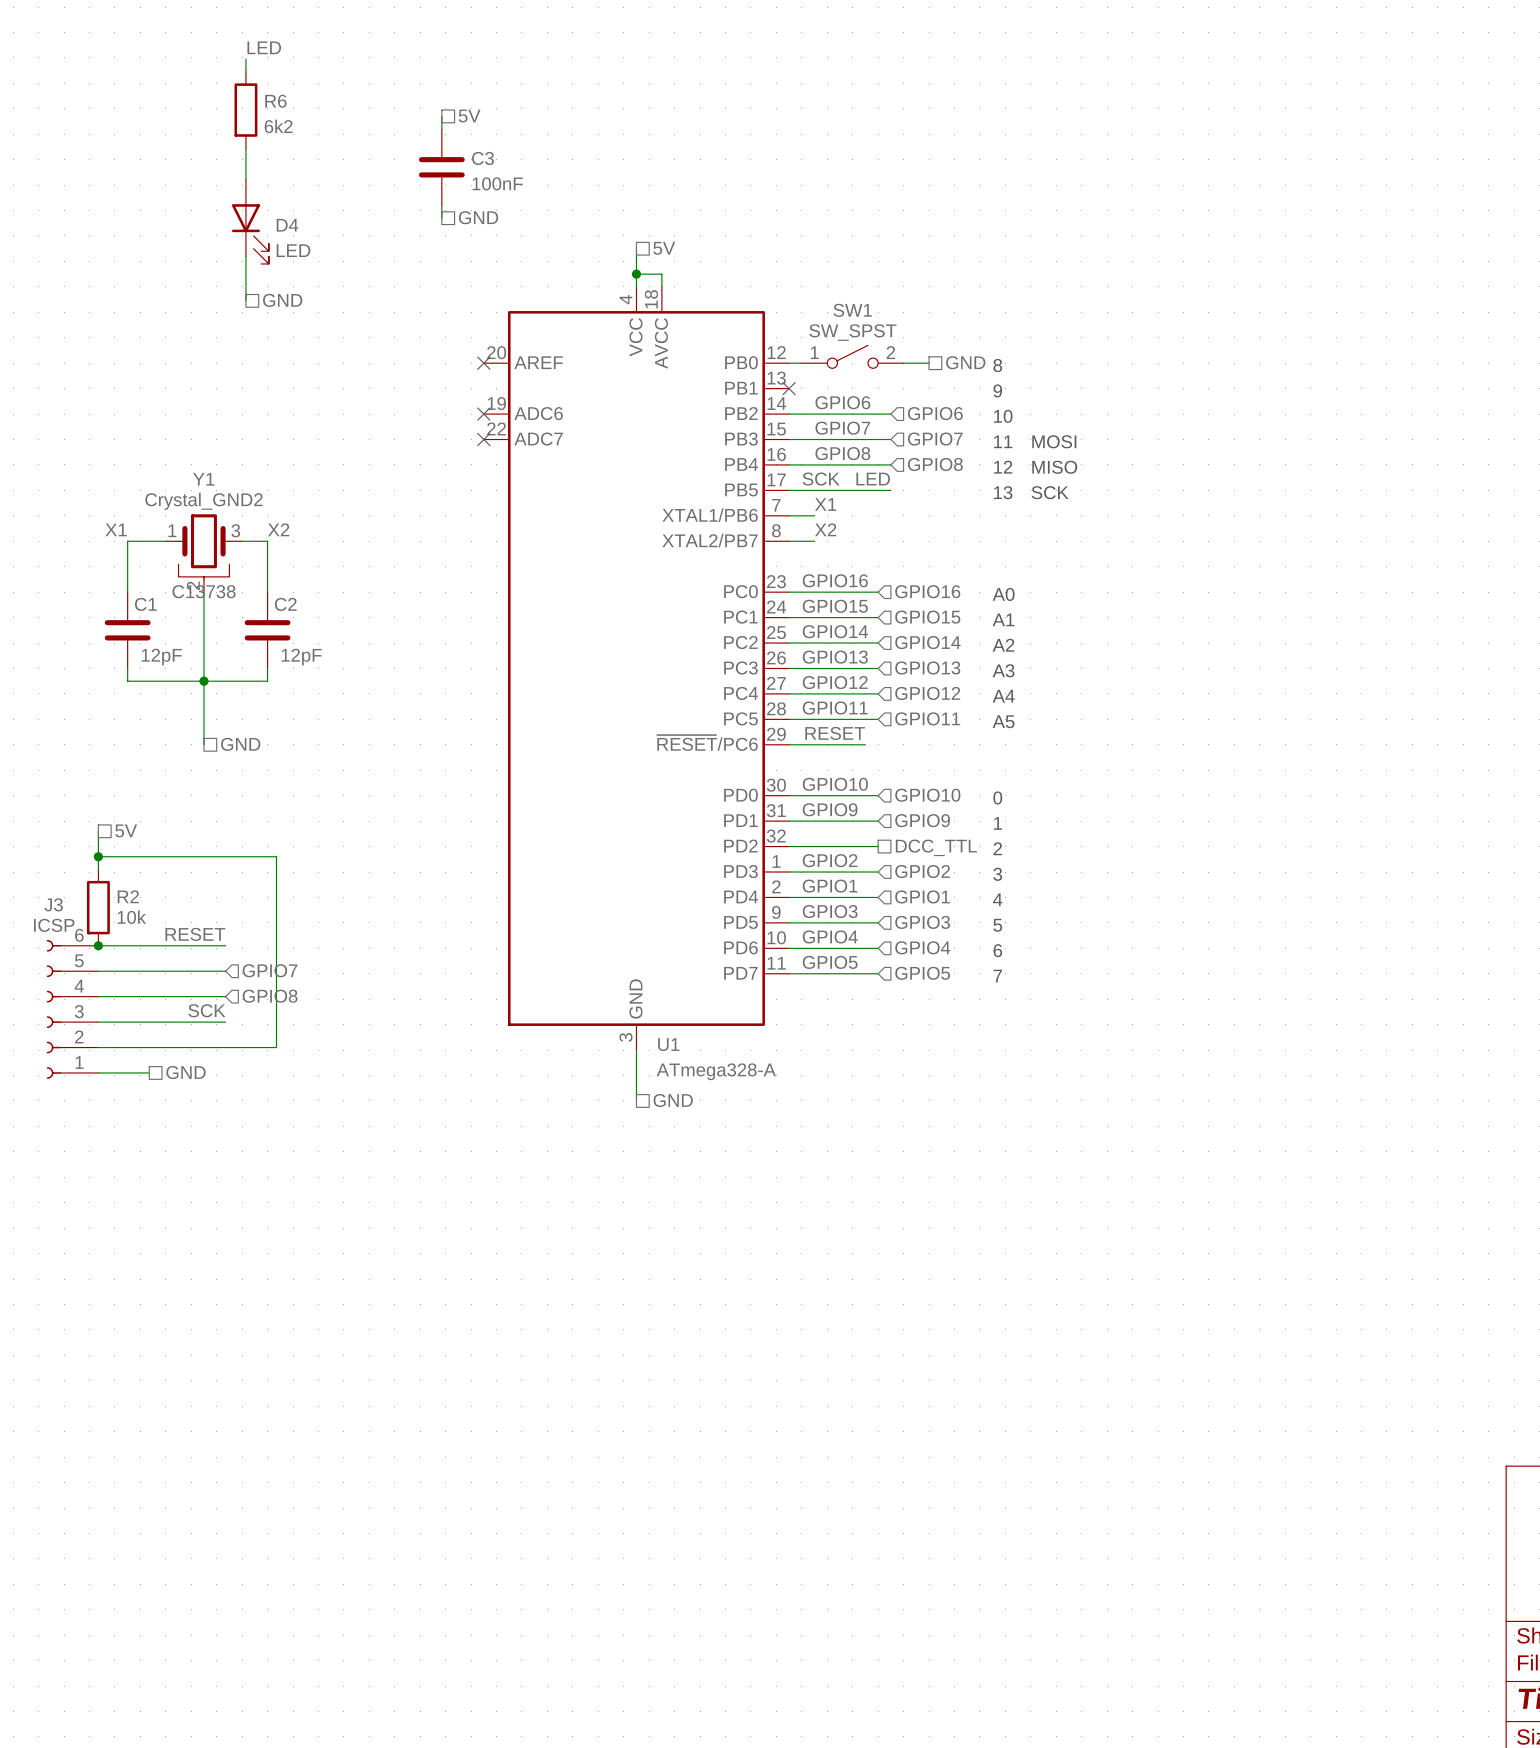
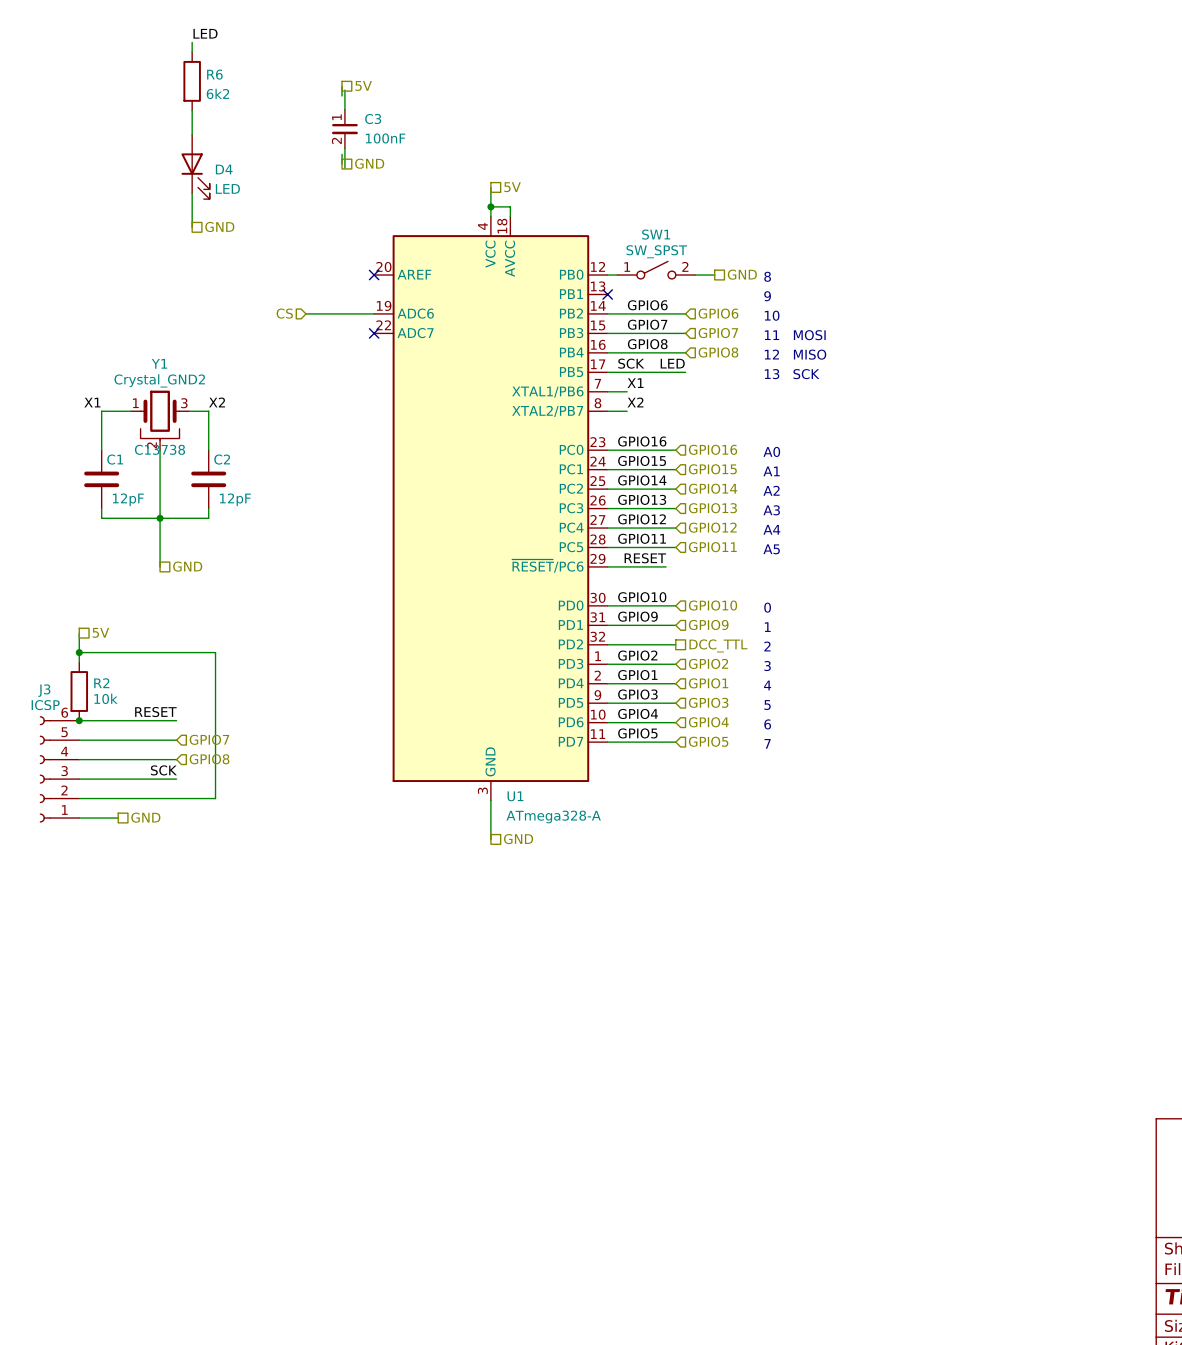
wire: none -> (344, 90) (344, 109)
C3 symbol: [418, 129, 465, 206] -> [332, 109, 358, 149]
wire: none -> (344, 148) (344, 167)
hierarchical label: none -> CS (284, 313)
wire: none -> (306, 313) (374, 313)
no-connect mark: (483, 414) -> none

